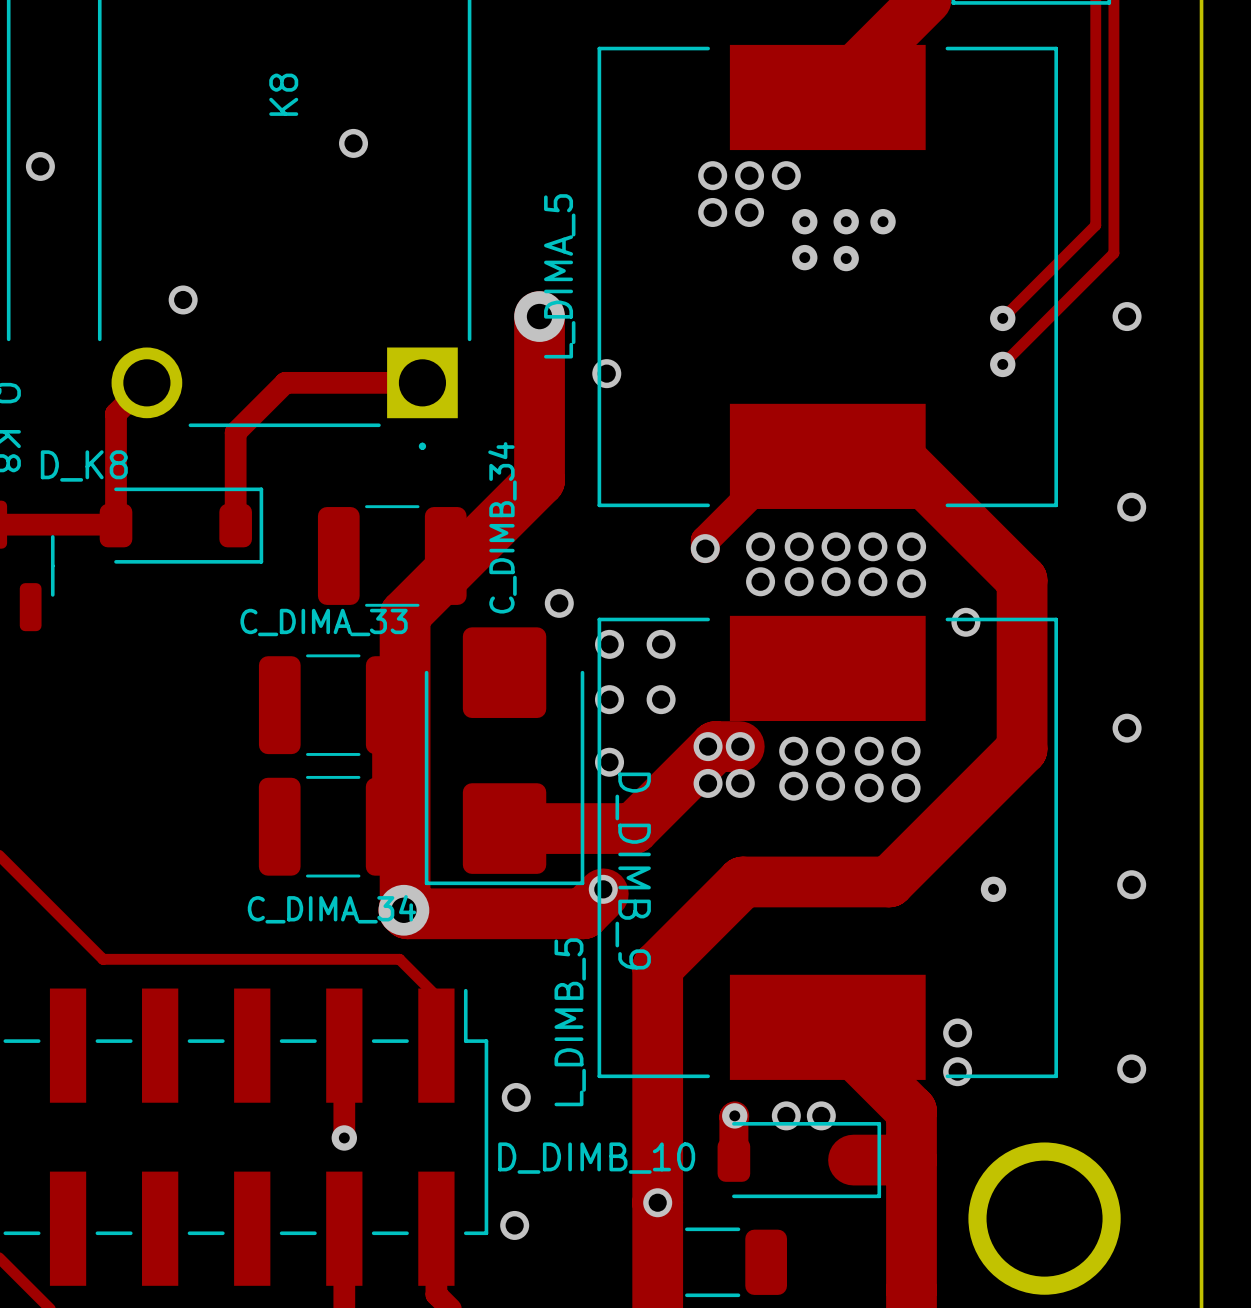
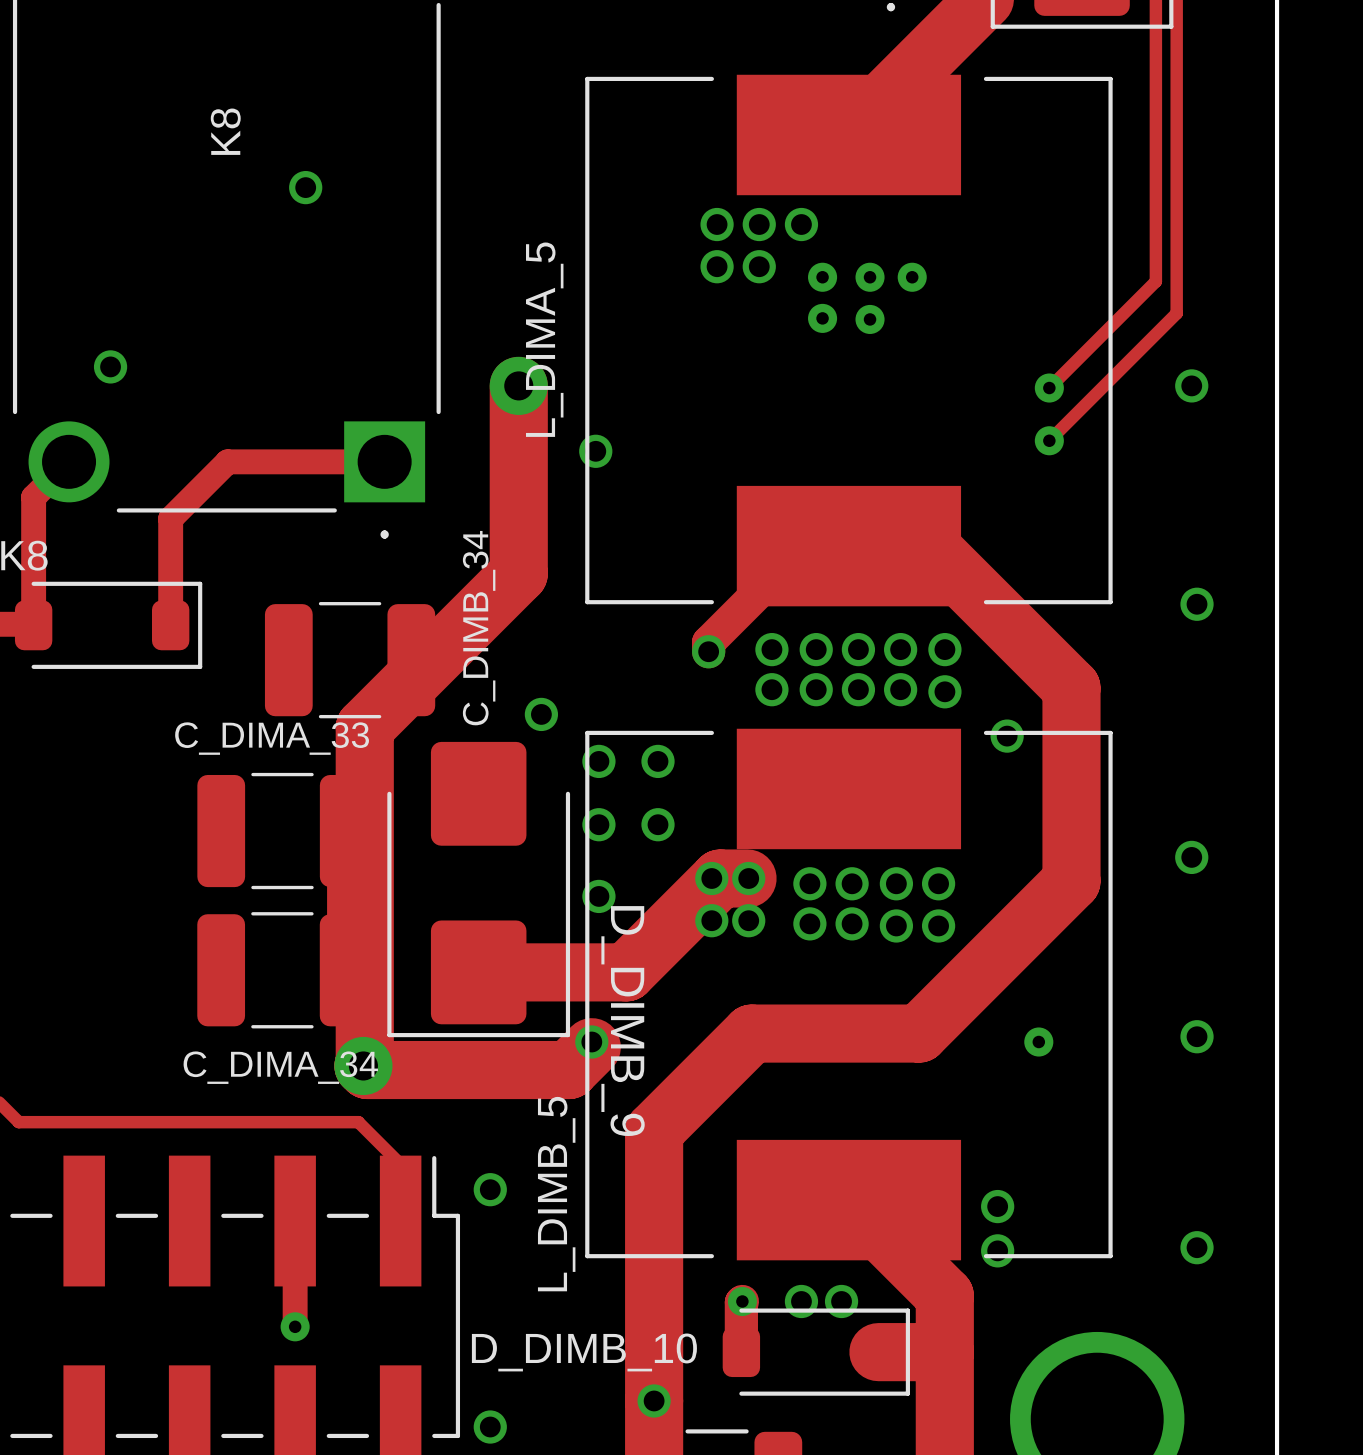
via position: (516, 1097) -> (490, 1189)

